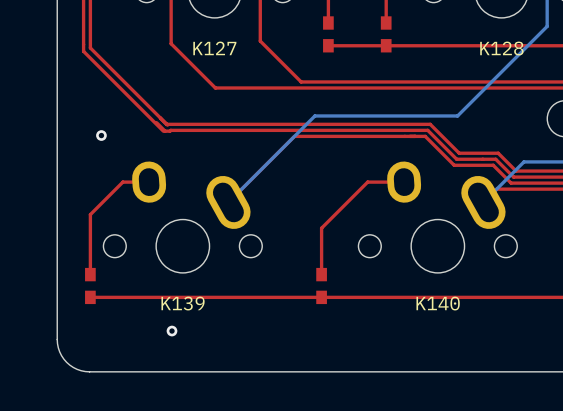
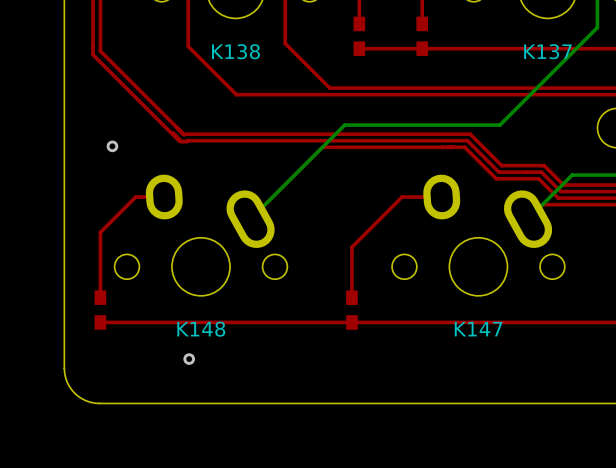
K127 name: K127 (214, 48) -> K138 (235, 51)
K128 name: K128 (501, 48) -> K137 (547, 51)
K139 name: K139 (183, 303) -> K148 (201, 329)
K140 name: K140 (438, 303) -> K147 (478, 329)

